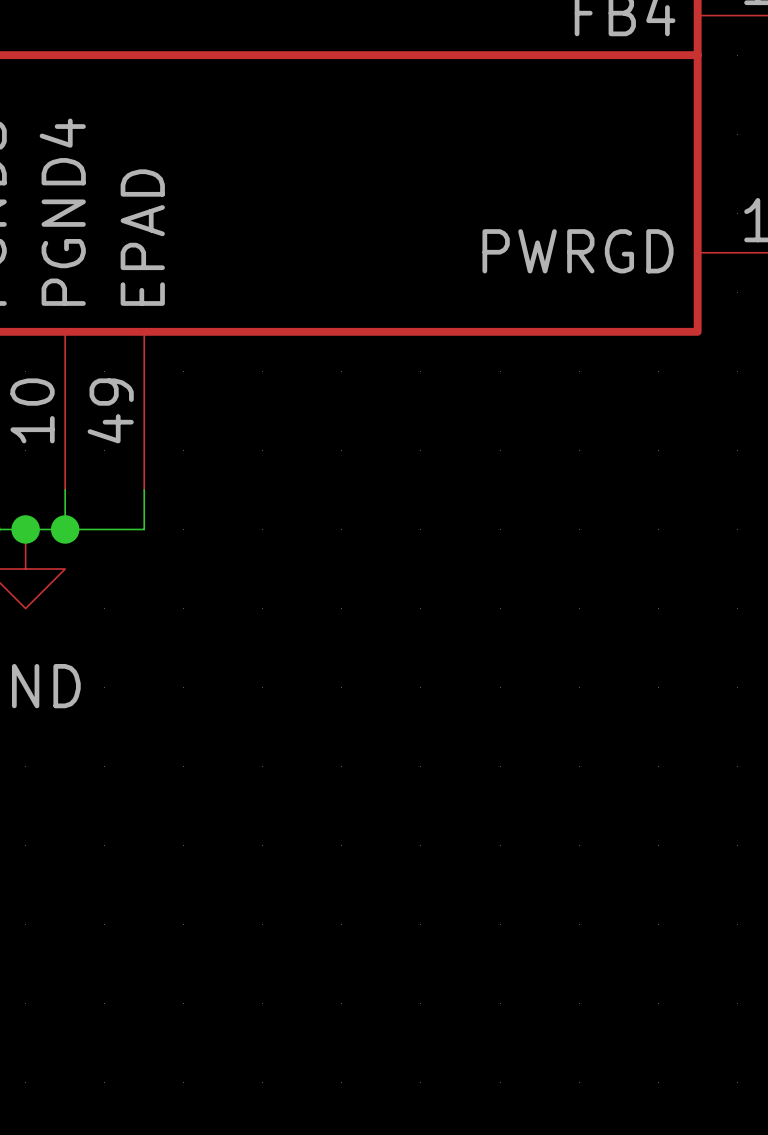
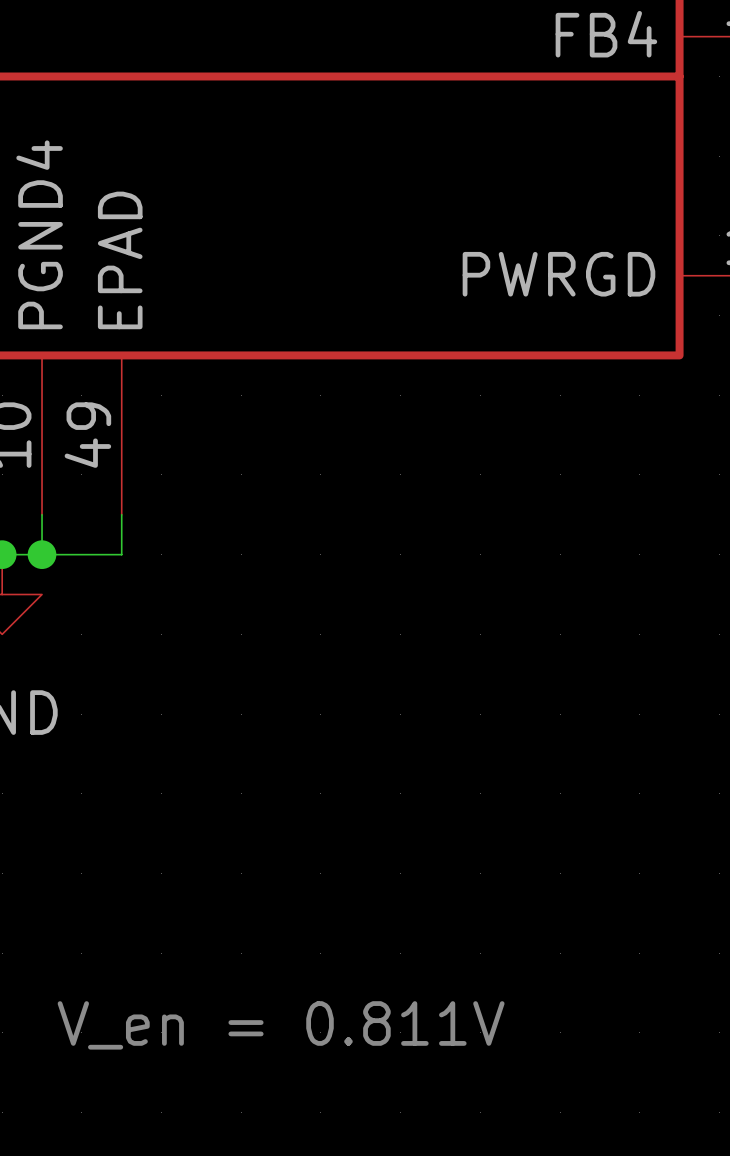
text: none -> V_en = 0.811V (281, 1025)

